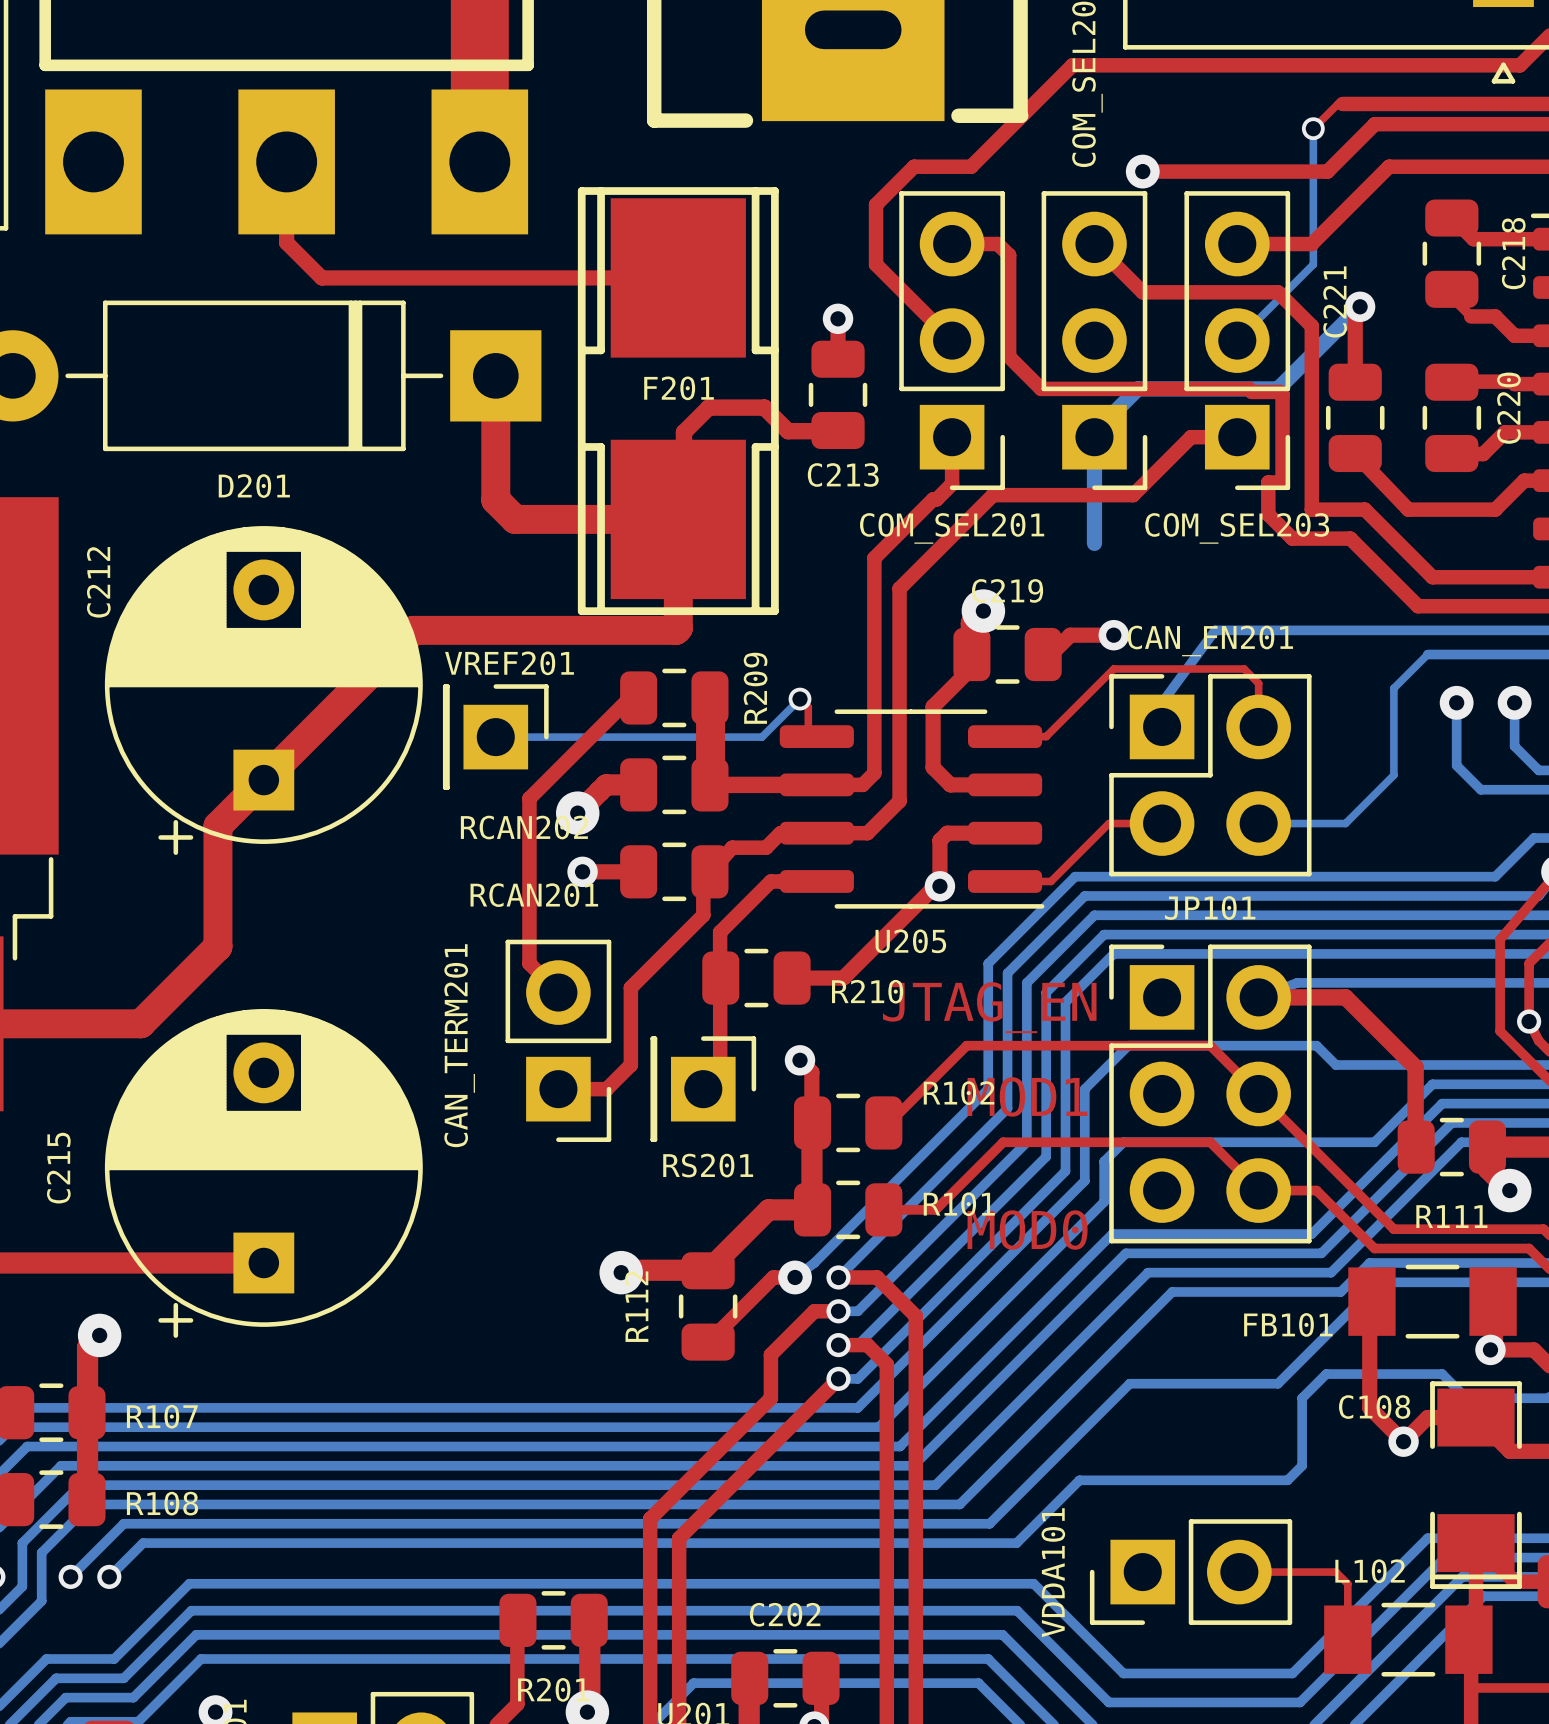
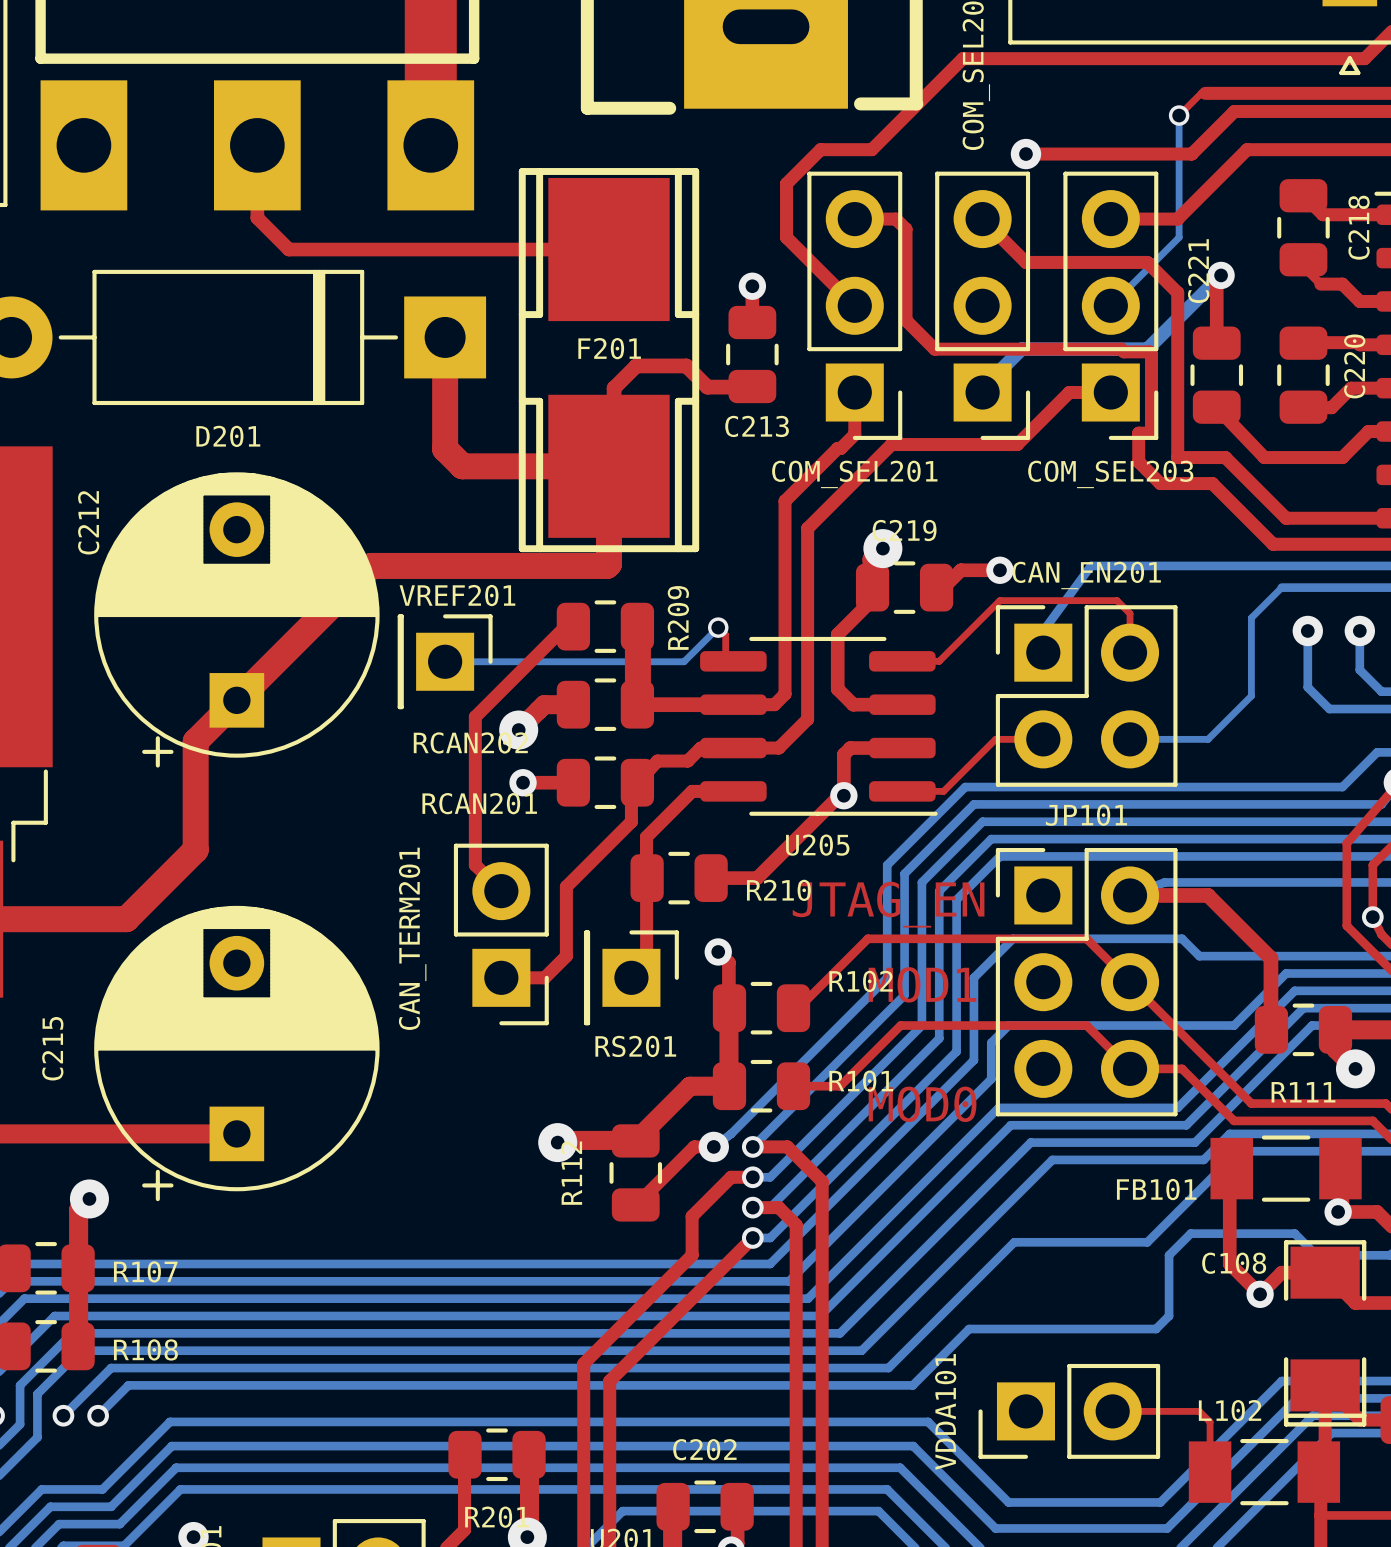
bottom track: (1094, 437) (1094, 543) -> none

